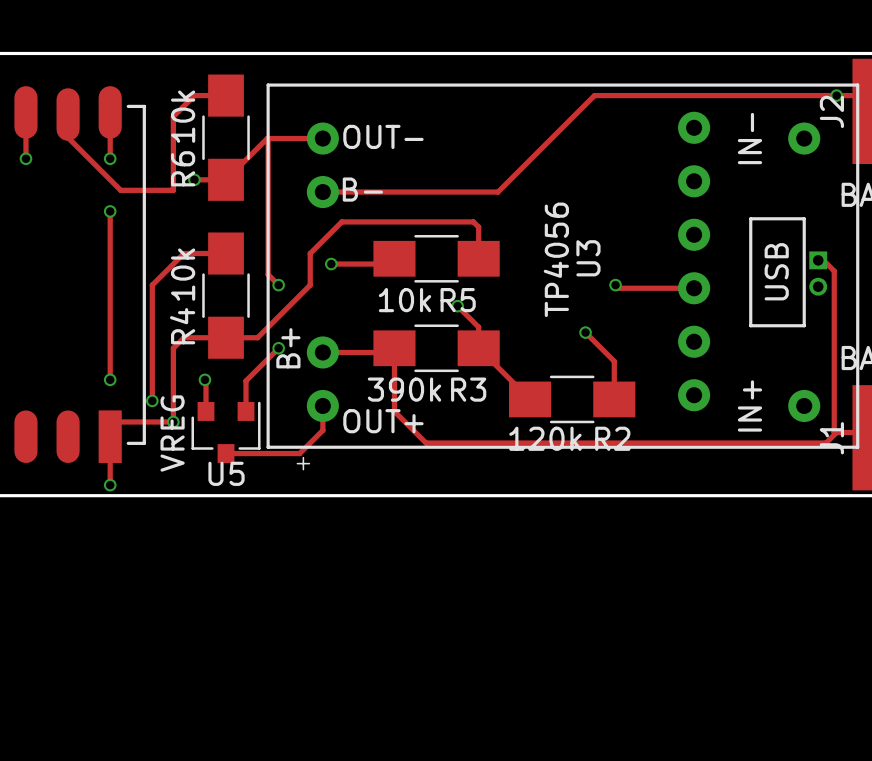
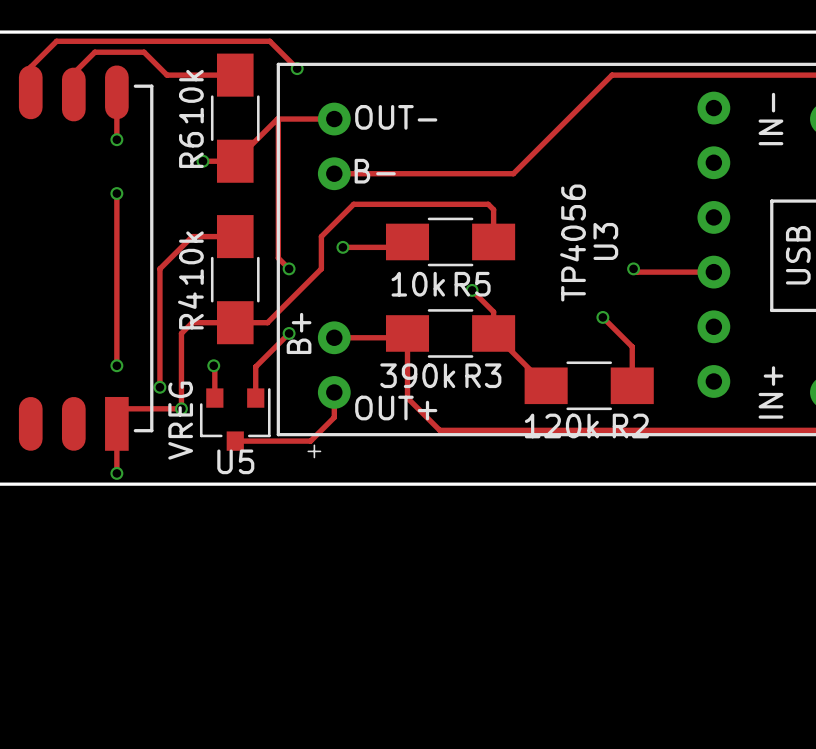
via: none -> (297, 68)
track: (194, 95) (173, 116) (173, 190) (120, 190) (68, 137) -> (202, 75) (167, 75) (144, 52) (94, 52) (73, 73) (73, 107)
track: (25, 127) (25, 158) -> (30, 107) (30, 67) (56, 41) (269, 41) (297, 68)
via: (25, 158) -> none

